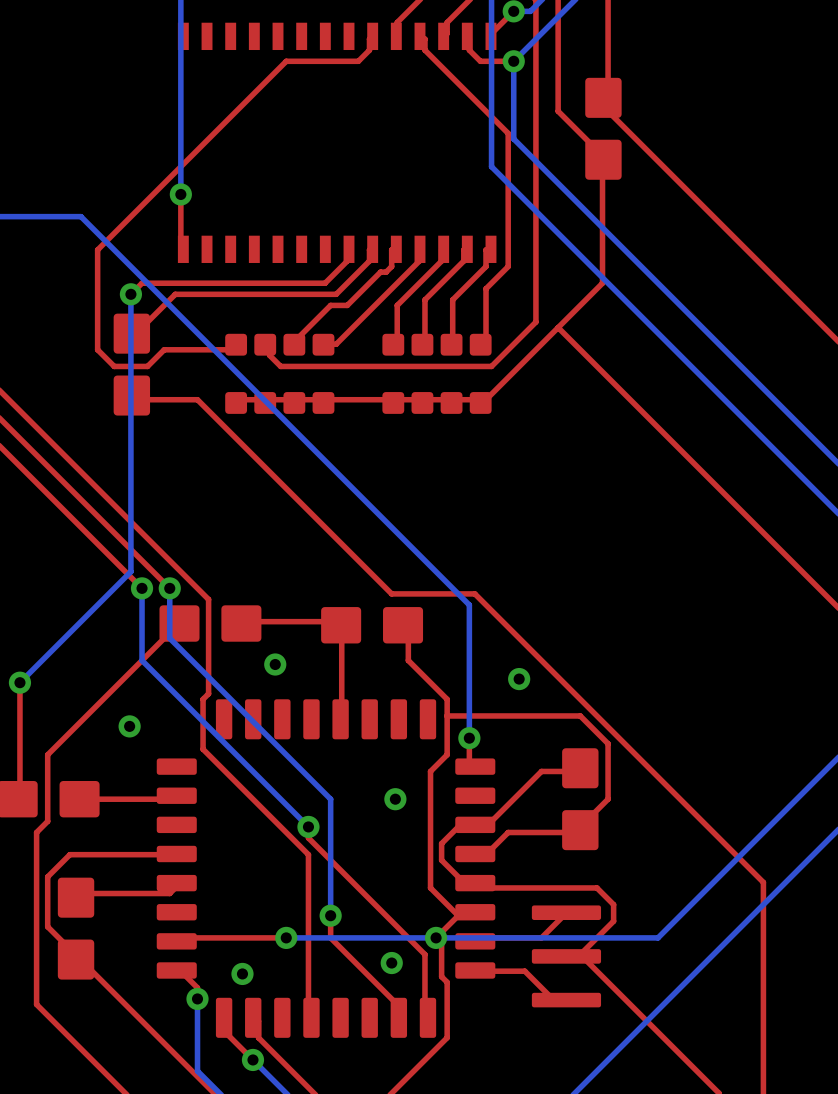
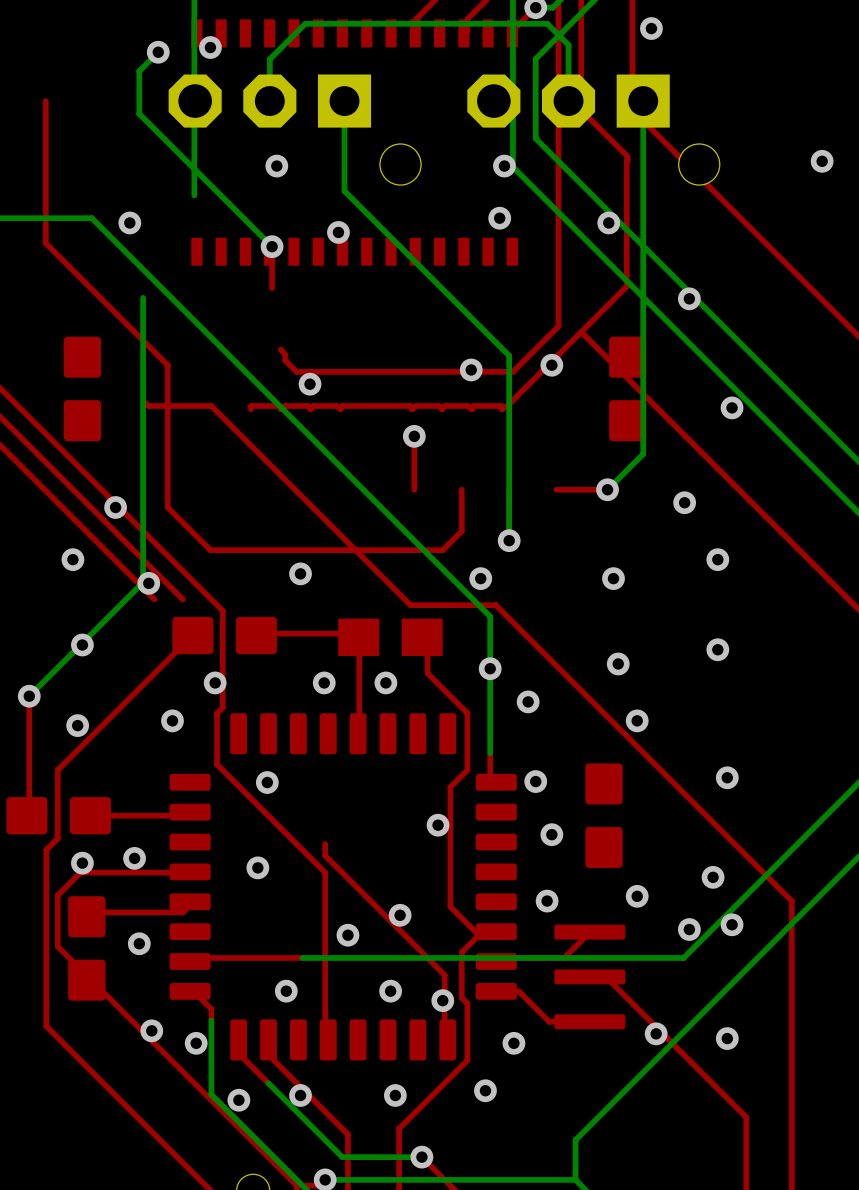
via: none -> (651, 28)
top track: (372, 36) (369, 39) (369, 50) (358, 61) (286, 61) (97, 249) (97, 349) (114, 366) (147, 366) (164, 349) (230, 349) (236, 344) -> none
top track: (419, 36) (424, 39) (424, 50) (508, 133) (508, 266) (486, 288) (486, 344) (480, 344) -> none
top track: (467, 36) (469, 39) (469, 50) (480, 61) (513, 61) -> none
via: none -> (210, 47)
bottom track: none -> (158, 52) (139, 71) (139, 113) (272, 246)
via: none -> (158, 52)
via: (513, 61) -> none
part footprint: [585, 77, 622, 180] -> [467, 74, 720, 186]
top track: none -> (45, 101) (45, 243) (167, 365) (167, 507) (210, 550) (442, 550) (461, 531) (461, 489)
bottom track: none -> (344, 101) (344, 191) (509, 355) (509, 540)
bottom track: none -> (568, 101) (568, 45) (547, 23) (305, 23) (269, 59) (269, 101)
bottom track: none -> (643, 101) (643, 454) (607, 489)
part: none -> (294, 129)
via: none -> (822, 161)
via: none -> (276, 166)
via: none -> (504, 166)
top track: (180, 194) (180, 244) (183, 249) -> none
via: (180, 194) -> none
via: none -> (499, 218)
via: none -> (129, 222)
via: none -> (608, 222)
via: none -> (338, 232)
top track: none -> (272, 246) (272, 288)
via: none -> (272, 246)
top track: (349, 249) (347, 249) (347, 261) (325, 283) (142, 283) (130, 294) -> none
top track: (372, 249) (369, 249) (369, 261) (336, 294) (175, 294) (136, 333) (131, 333) -> none
top track: (396, 249) (391, 249) (391, 266) (386, 272) (380, 272) (347, 305) (330, 305) (297, 338) (297, 344) (294, 344) -> none
top track: (419, 249) (419, 261) (336, 344) (323, 344) -> none
top track: (443, 249) (441, 249) (441, 261) (397, 305) (397, 344) (393, 344) -> none
top track: (467, 249) (463, 249) (463, 261) (424, 299) (424, 344) (422, 344) -> none
top track: (490, 249) (486, 249) (486, 266) (452, 299) (451, 344) -> none
via: (130, 294) -> none
via: none -> (689, 298)
via: none -> (551, 365)
part position: (131, 364) -> (82, 388)
via: none -> (471, 369)
part: (279, 373) -> none
part: (436, 373) -> none
via: none -> (310, 384)
part: none -> (627, 388)
via: none -> (732, 407)
top track: none -> (414, 436) (414, 489)
via: none -> (414, 436)
top track: none -> (607, 489) (556, 489)
via: none -> (607, 489)
via: none -> (684, 502)
via: none -> (115, 507)
via: none -> (509, 540)
via: none -> (72, 559)
via: none -> (717, 559)
via: none -> (300, 573)
via: none -> (480, 578)
via: none -> (613, 578)
bottom track: (142, 588) (142, 660) (308, 826) -> none
via position: (142, 588) -> (148, 583)
bottom track: (169, 588) (169, 638) (330, 799) (330, 915) -> none
via: (169, 588) -> none
part footprint: [321, 607, 424, 644] -> [338, 618, 443, 656]
via: none -> (82, 645)
via: none -> (717, 649)
via: none -> (618, 663)
via: none -> (490, 668)
via position: (275, 664) -> (324, 682)
via: none -> (215, 682)
via: none -> (385, 682)
via position: (519, 679) -> (528, 701)
via: none -> (172, 720)
via: none -> (637, 720)
via: none -> (77, 725)
top track: (447, 715) (580, 715) (608, 743) (608, 799) (580, 826) (580, 832) (508, 832) (491, 849) (480, 849) (475, 853) -> none
via: (129, 726) -> none
via: (469, 738) -> none
via: none -> (727, 777)
via: none -> (535, 781)
via: none -> (267, 782)
top track: (580, 768) (580, 771) (541, 771) (491, 821) (480, 821) (474, 826) (458, 826) (441, 843) (441, 860) (463, 882) (474, 882) (480, 887) (596, 887) (613, 904) (613, 921) (580, 954) -> none
via position: (395, 799) -> (438, 825)
via: none -> (551, 834)
via: (308, 826) -> none
via: none -> (134, 858)
via: none -> (82, 863)
via: none -> (257, 867)
via: none -> (713, 877)
via: none -> (637, 896)
via: none -> (547, 901)
via: none -> (400, 915)
via: none -> (732, 924)
via: none -> (689, 929)
top track: (330, 915) (330, 937) (397, 1004) (398, 1017) -> none
via: none -> (139, 943)
via: (286, 937) -> none
via: (436, 937) -> none
via position: (391, 963) -> (390, 991)
via: none -> (286, 991)
top track: (475, 970) (524, 971) (552, 998) (566, 1000) -> (496, 991) (518, 991) (549, 1021) (589, 1021)
via: (242, 973) -> none
via: none -> (442, 1000)
via position: (197, 998) -> (196, 1043)
via: none -> (151, 1030)
via: none -> (656, 1033)
via: none -> (727, 1038)
via: none -> (513, 1043)
via: (252, 1059) -> none
via: none -> (485, 1090)
via: none -> (300, 1095)
via: none -> (395, 1095)
via: none -> (238, 1100)

